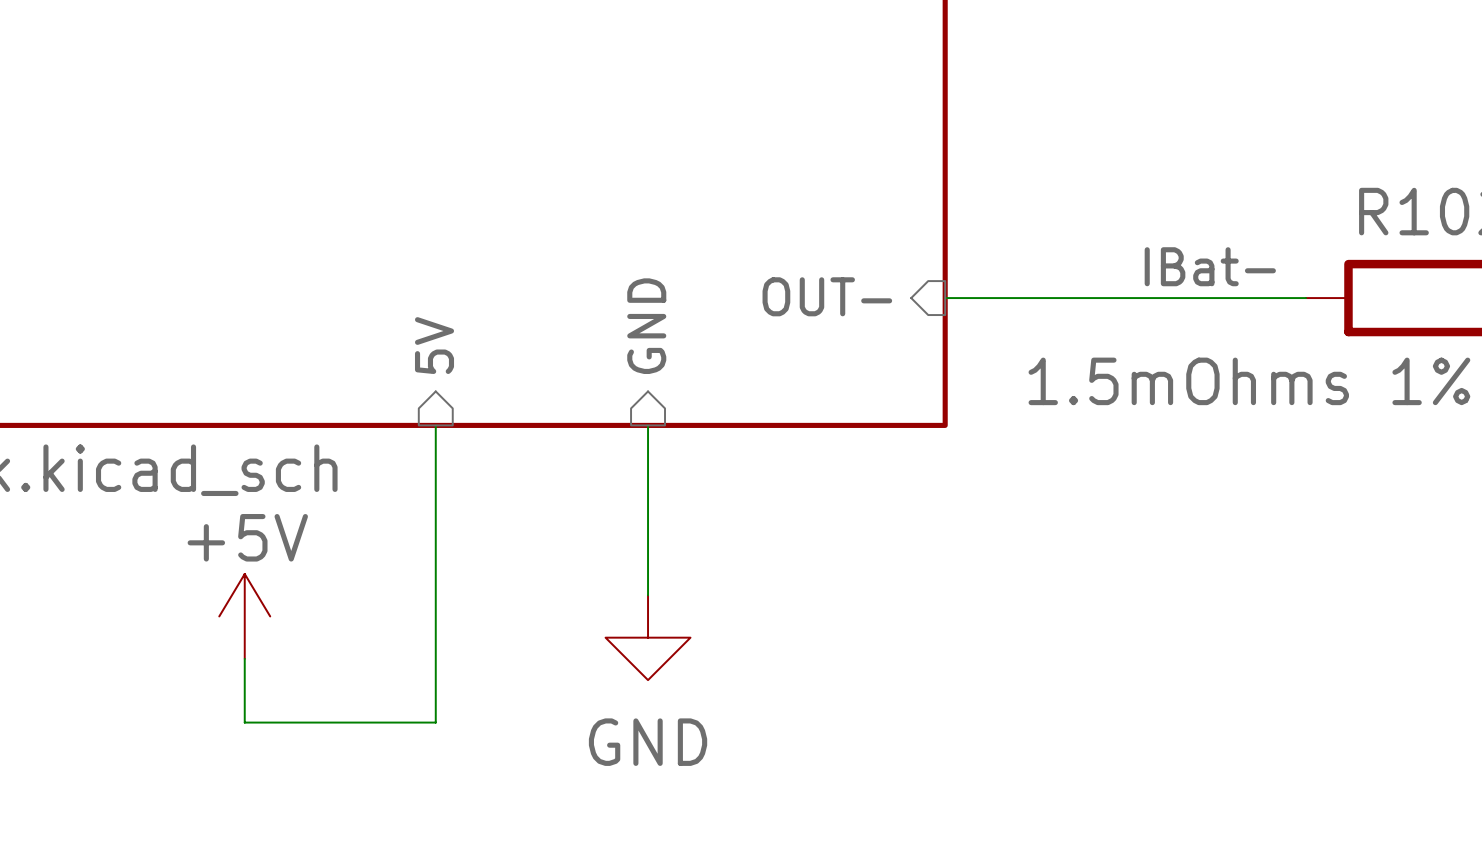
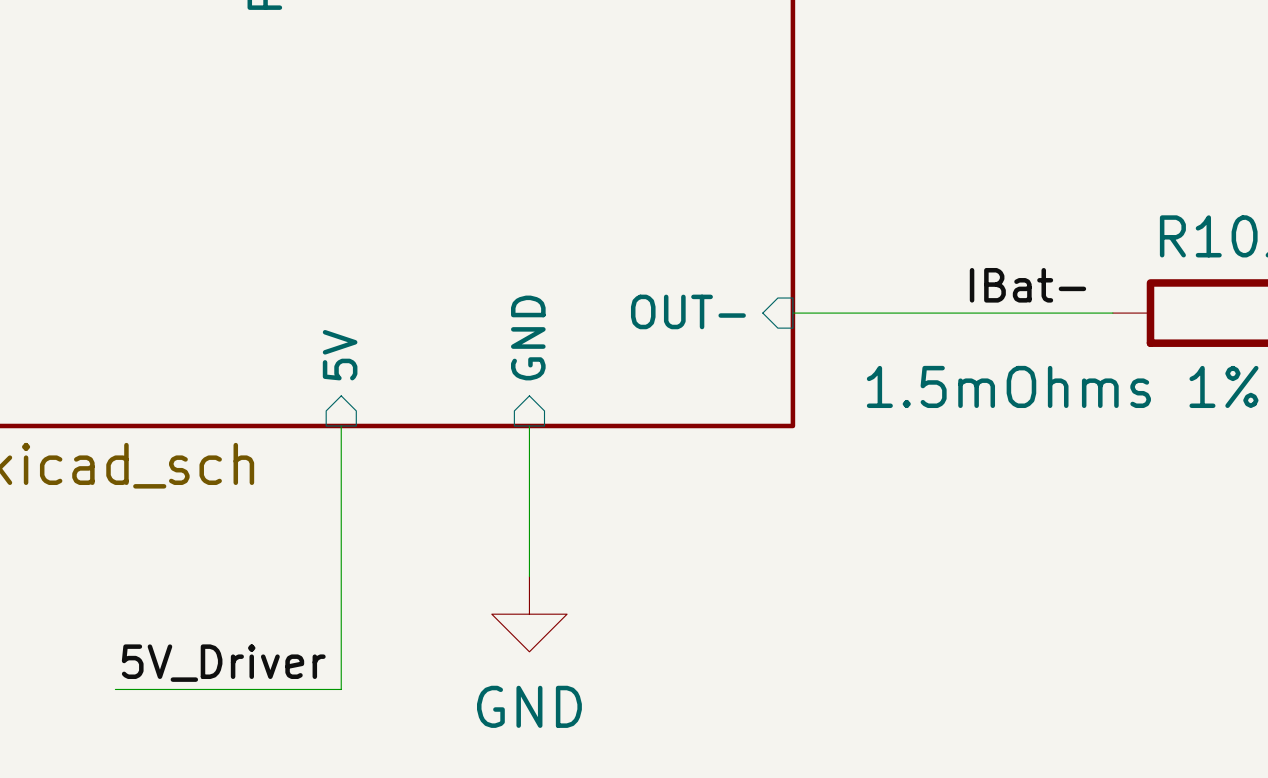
power symbol: +5V (244, 616) -> none
wire: (244, 658) (244, 722) -> (115, 689) (171, 689)
label: none -> 5V_Driver (223, 663)

